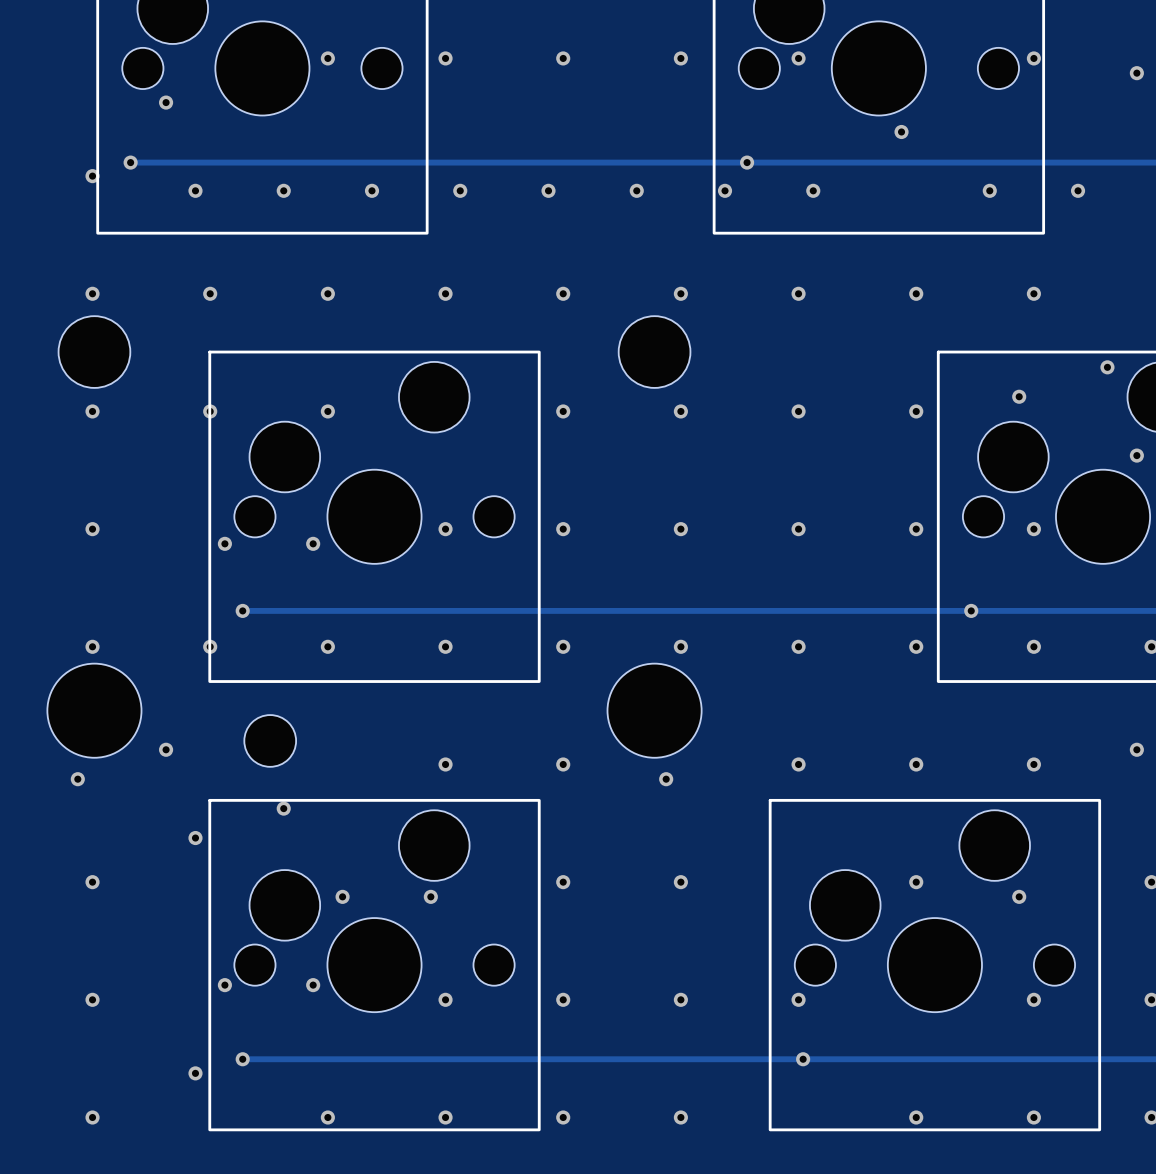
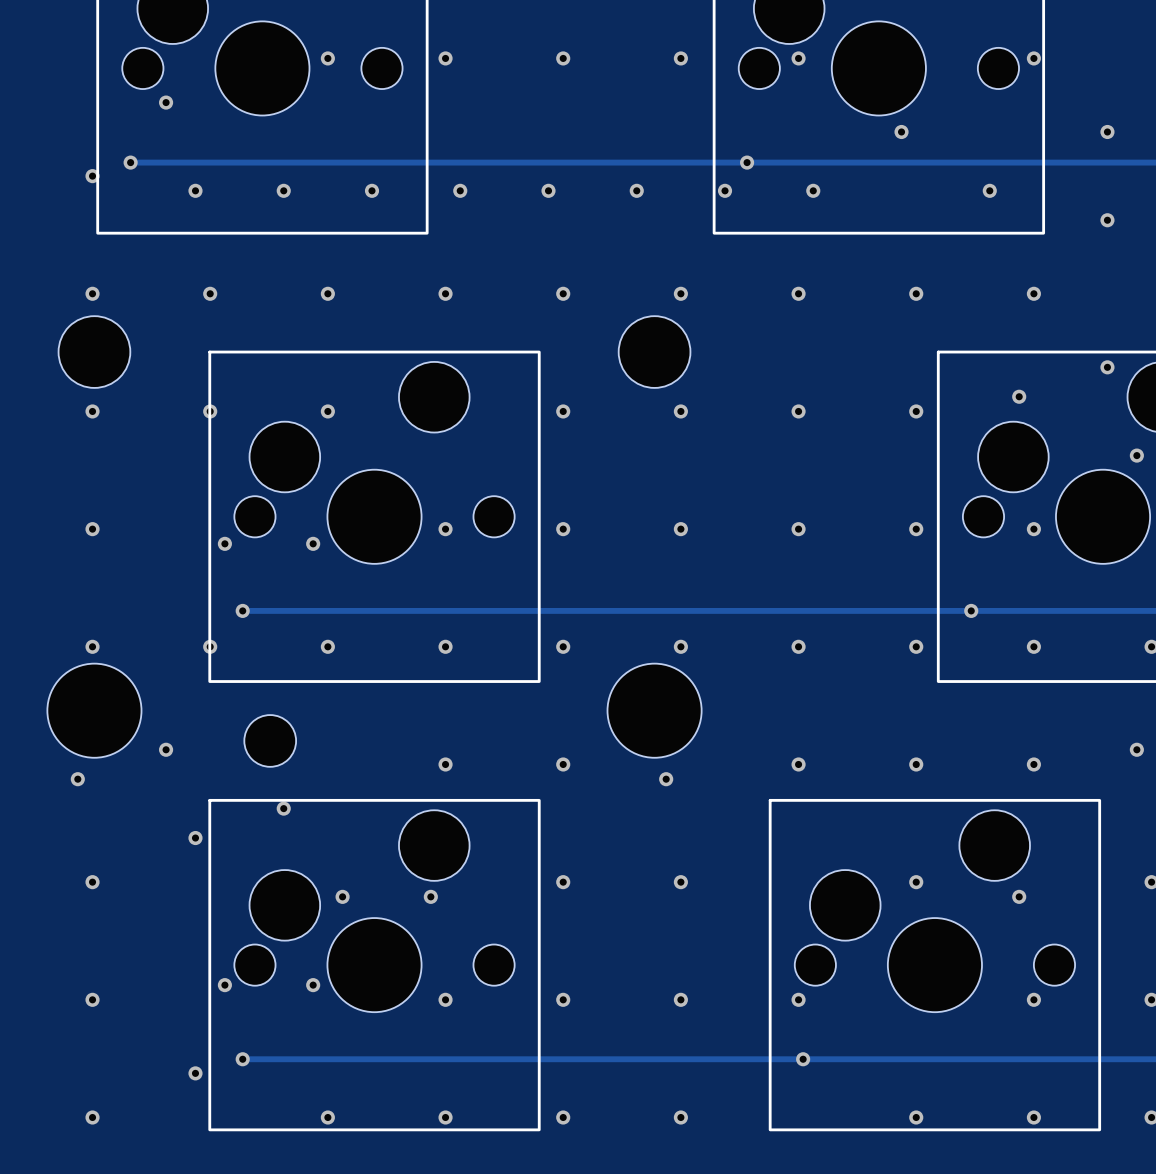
via: (1136, 73) -> none
via: none -> (1107, 131)
via: (1078, 190) -> none
via: none -> (1107, 220)

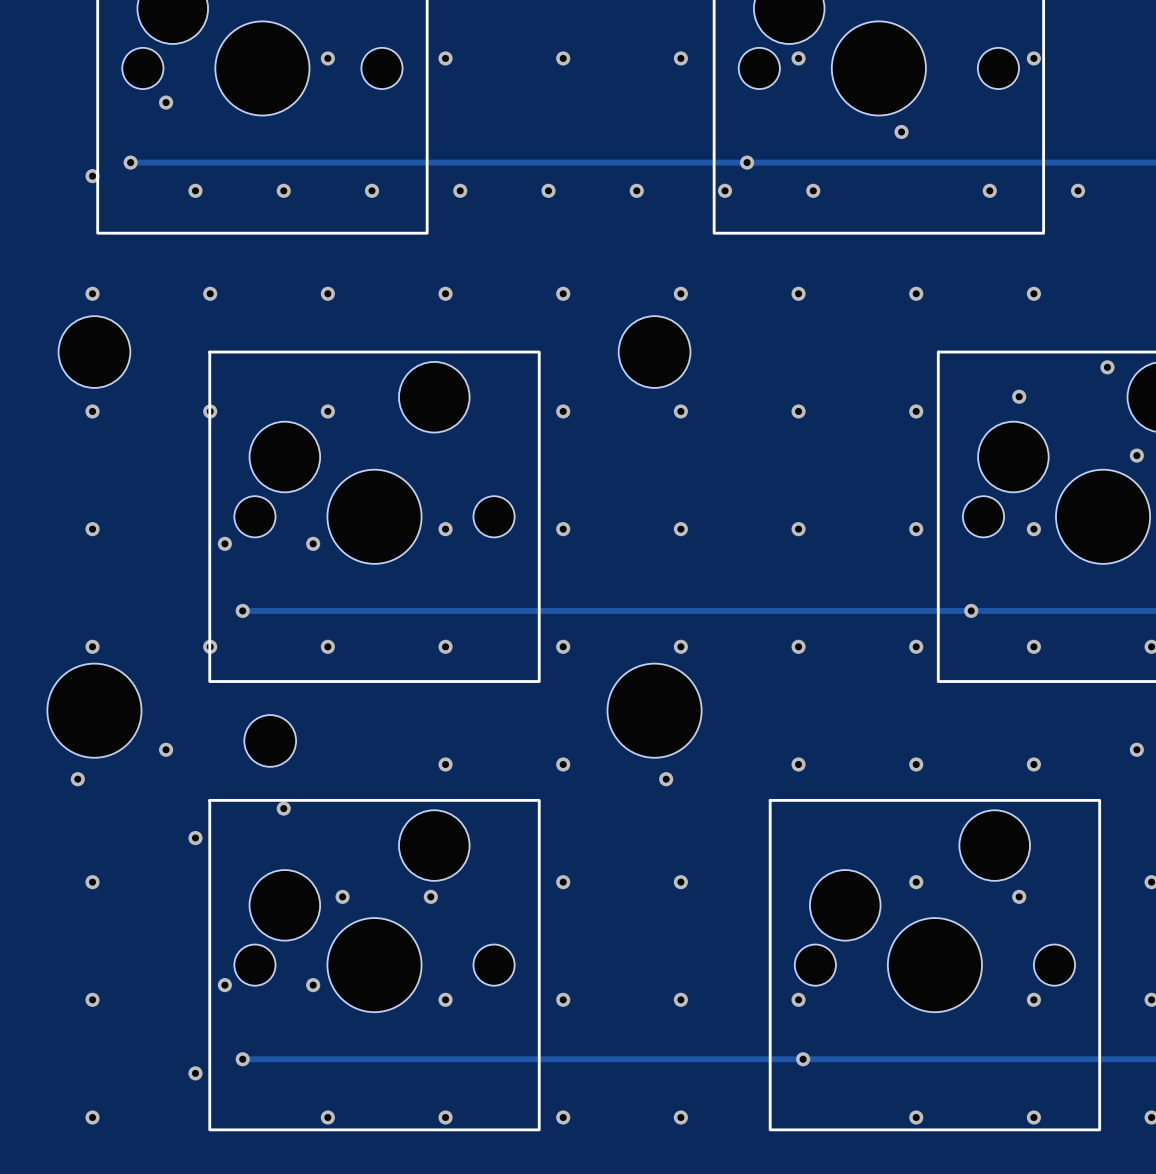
via: (1107, 131) -> none
via: none -> (1078, 190)
via: (1107, 220) -> none

